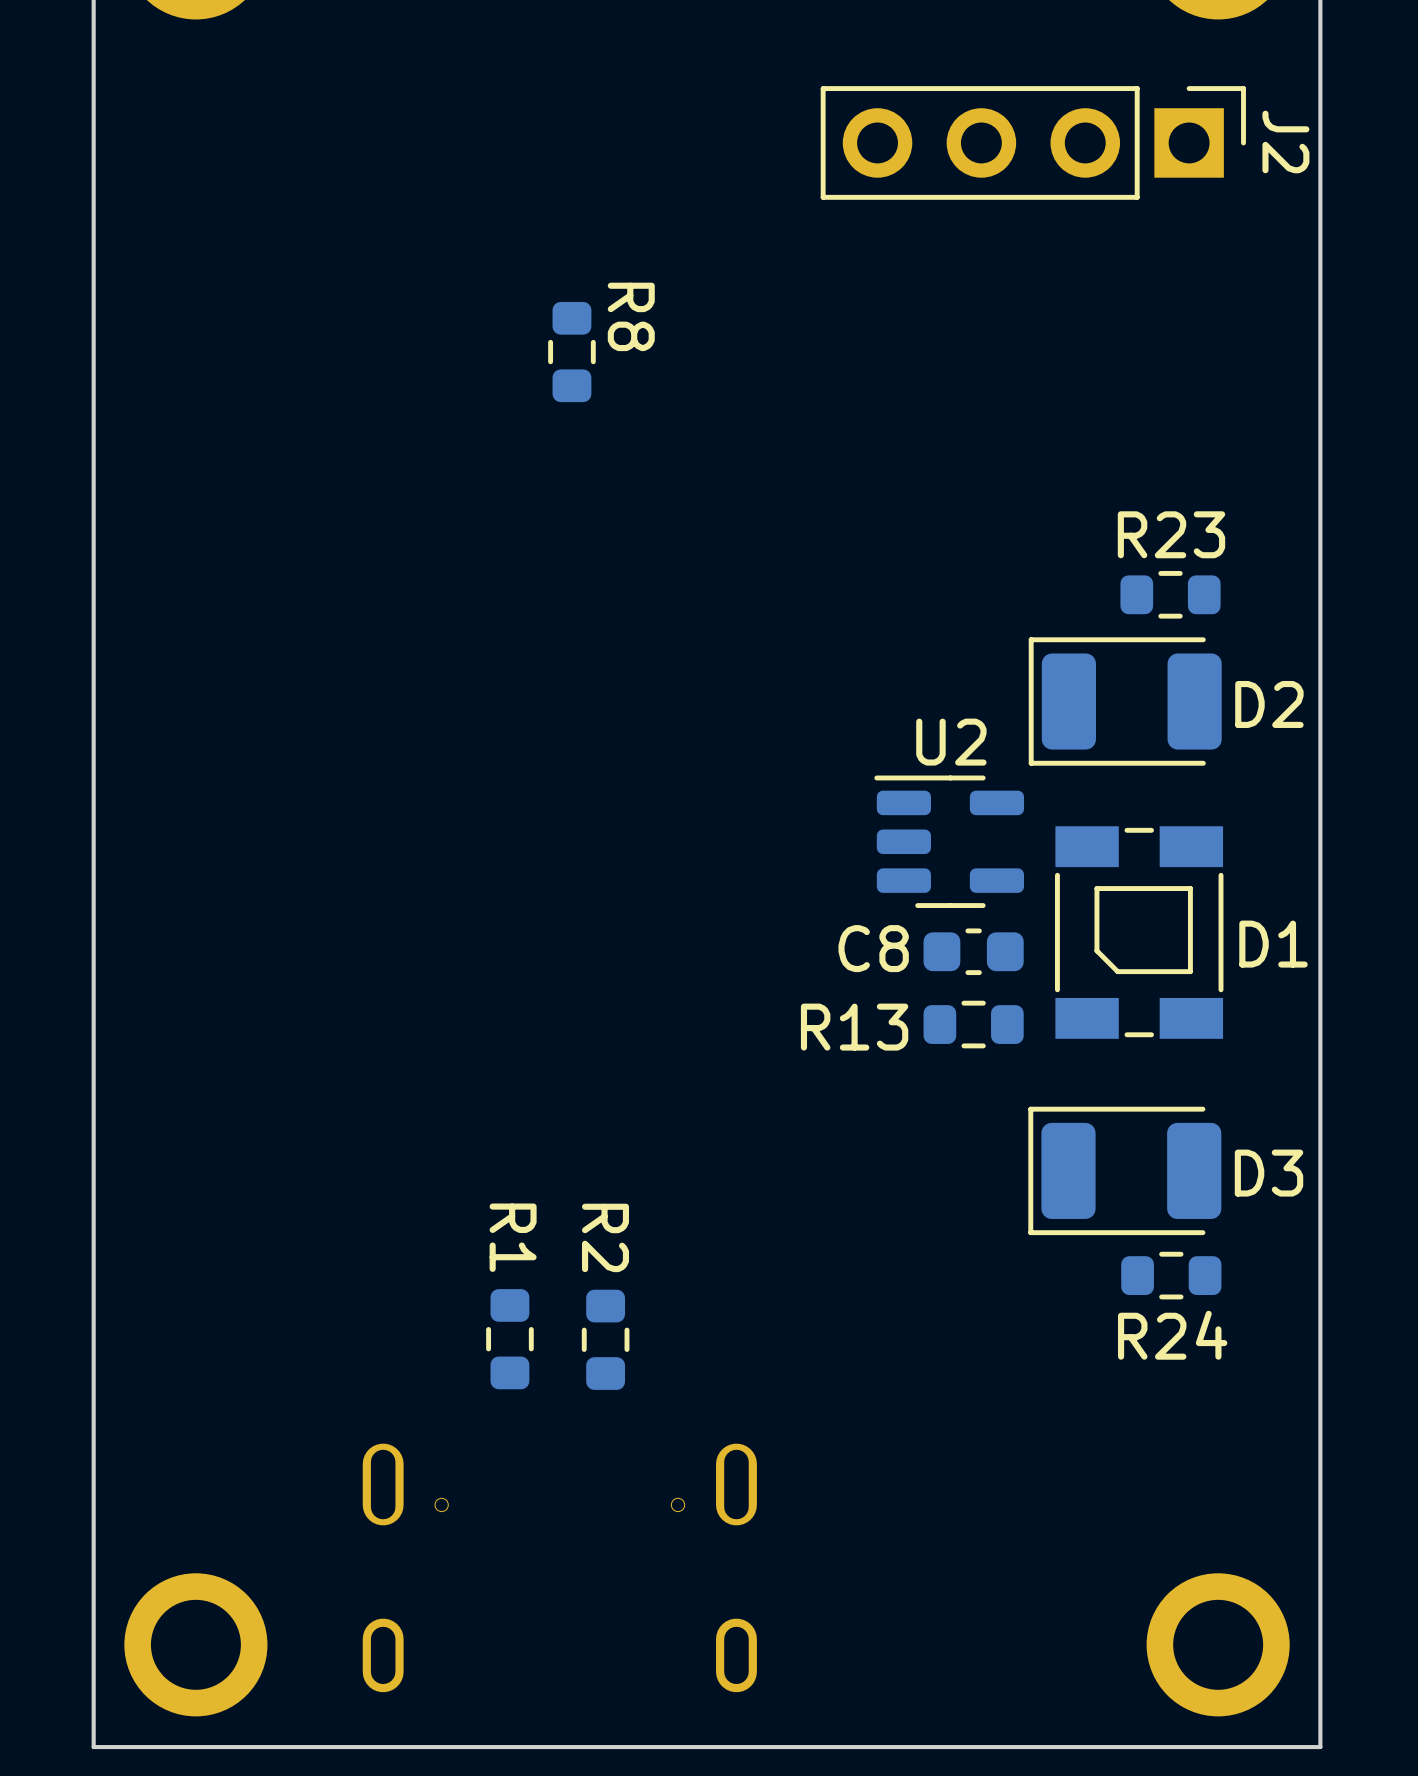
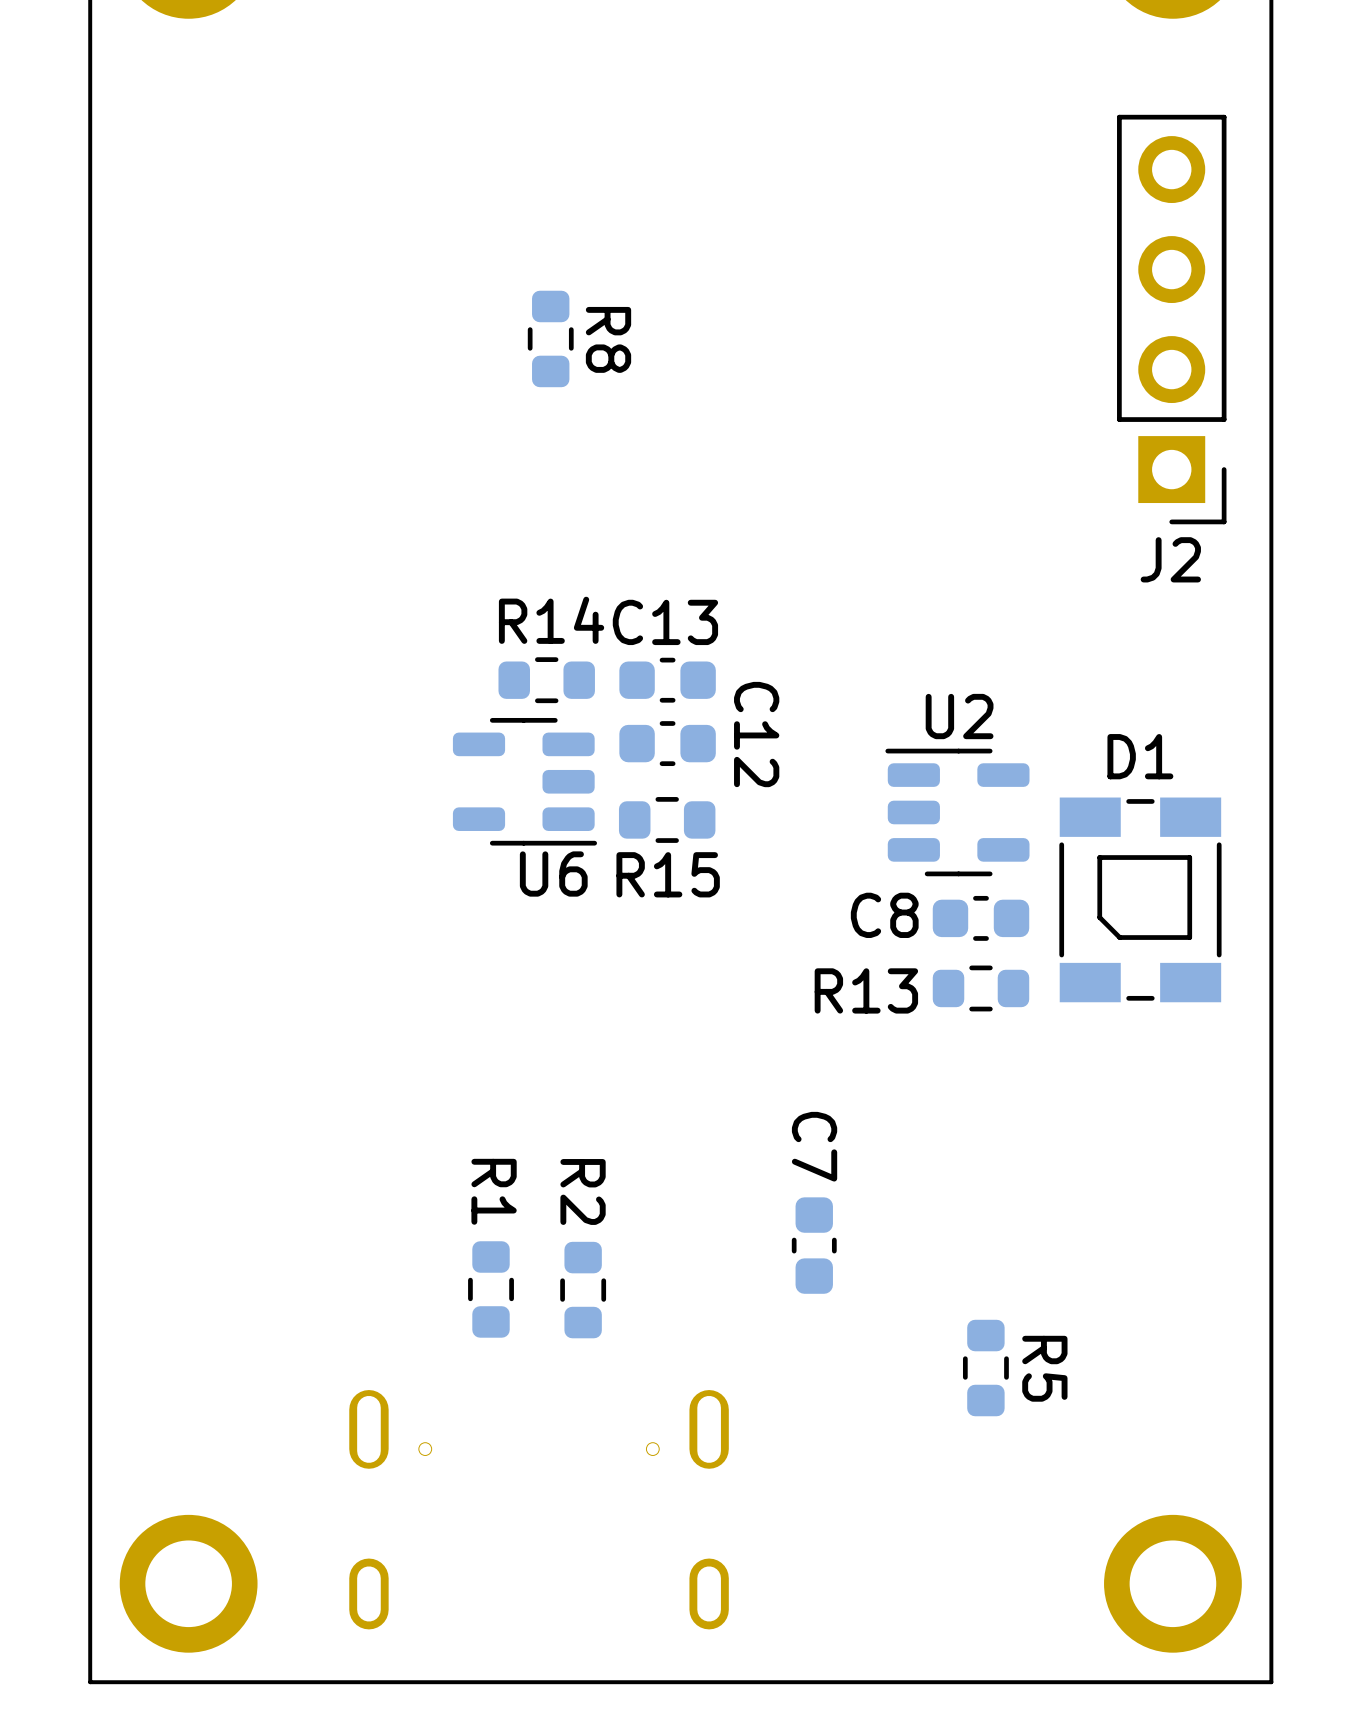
J2 rotation: 0° (1033, 142) -> 90° clockwise (1171, 319)
J2 position: (1033, 142) -> (1171, 319)
R8 name position: R8 (631, 316) -> R8 (608, 339)
R23: (1170, 594) -> none
D2: (1125, 701) -> none
R14: none -> (546, 680)
C13: none -> (667, 680)
C12: none -> (667, 743)
U6: none -> (524, 781)
U2 position: (949, 841) -> (957, 812)
R15: none -> (667, 819)
D1 position: (1139, 932) -> (1140, 899)
D1 name position: D1 (1273, 944) -> D1 (1140, 756)
C8 position: (973, 951) -> (980, 918)
R13 position: (973, 1024) -> (980, 988)
D3: (1124, 1170) -> none
R24: (1171, 1275) -> none
C7: none -> (814, 1245)
R5: none -> (985, 1368)

